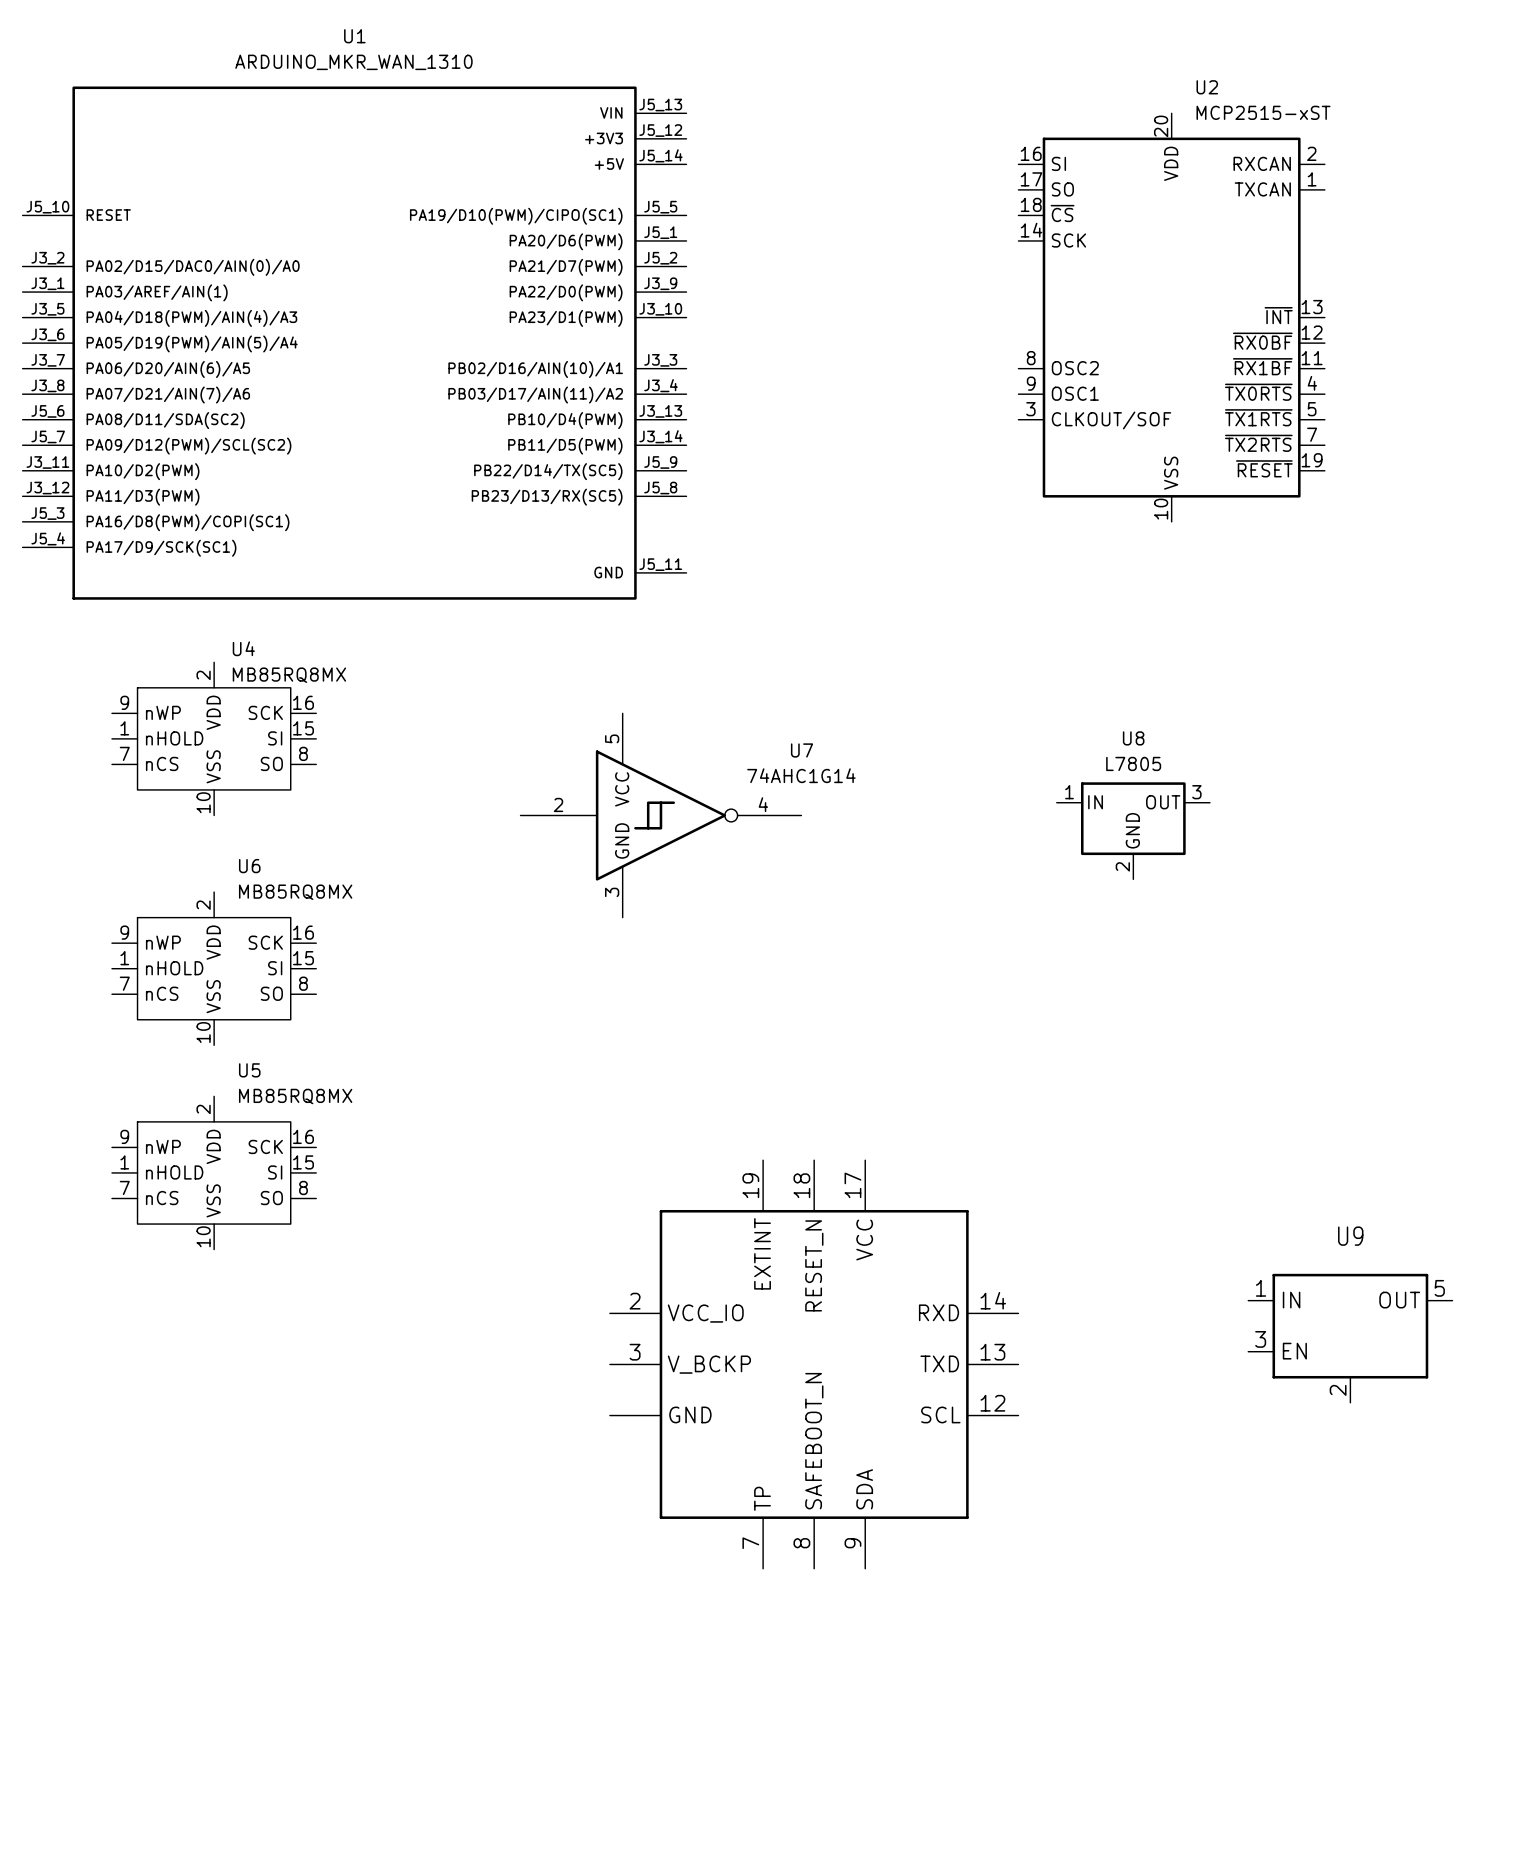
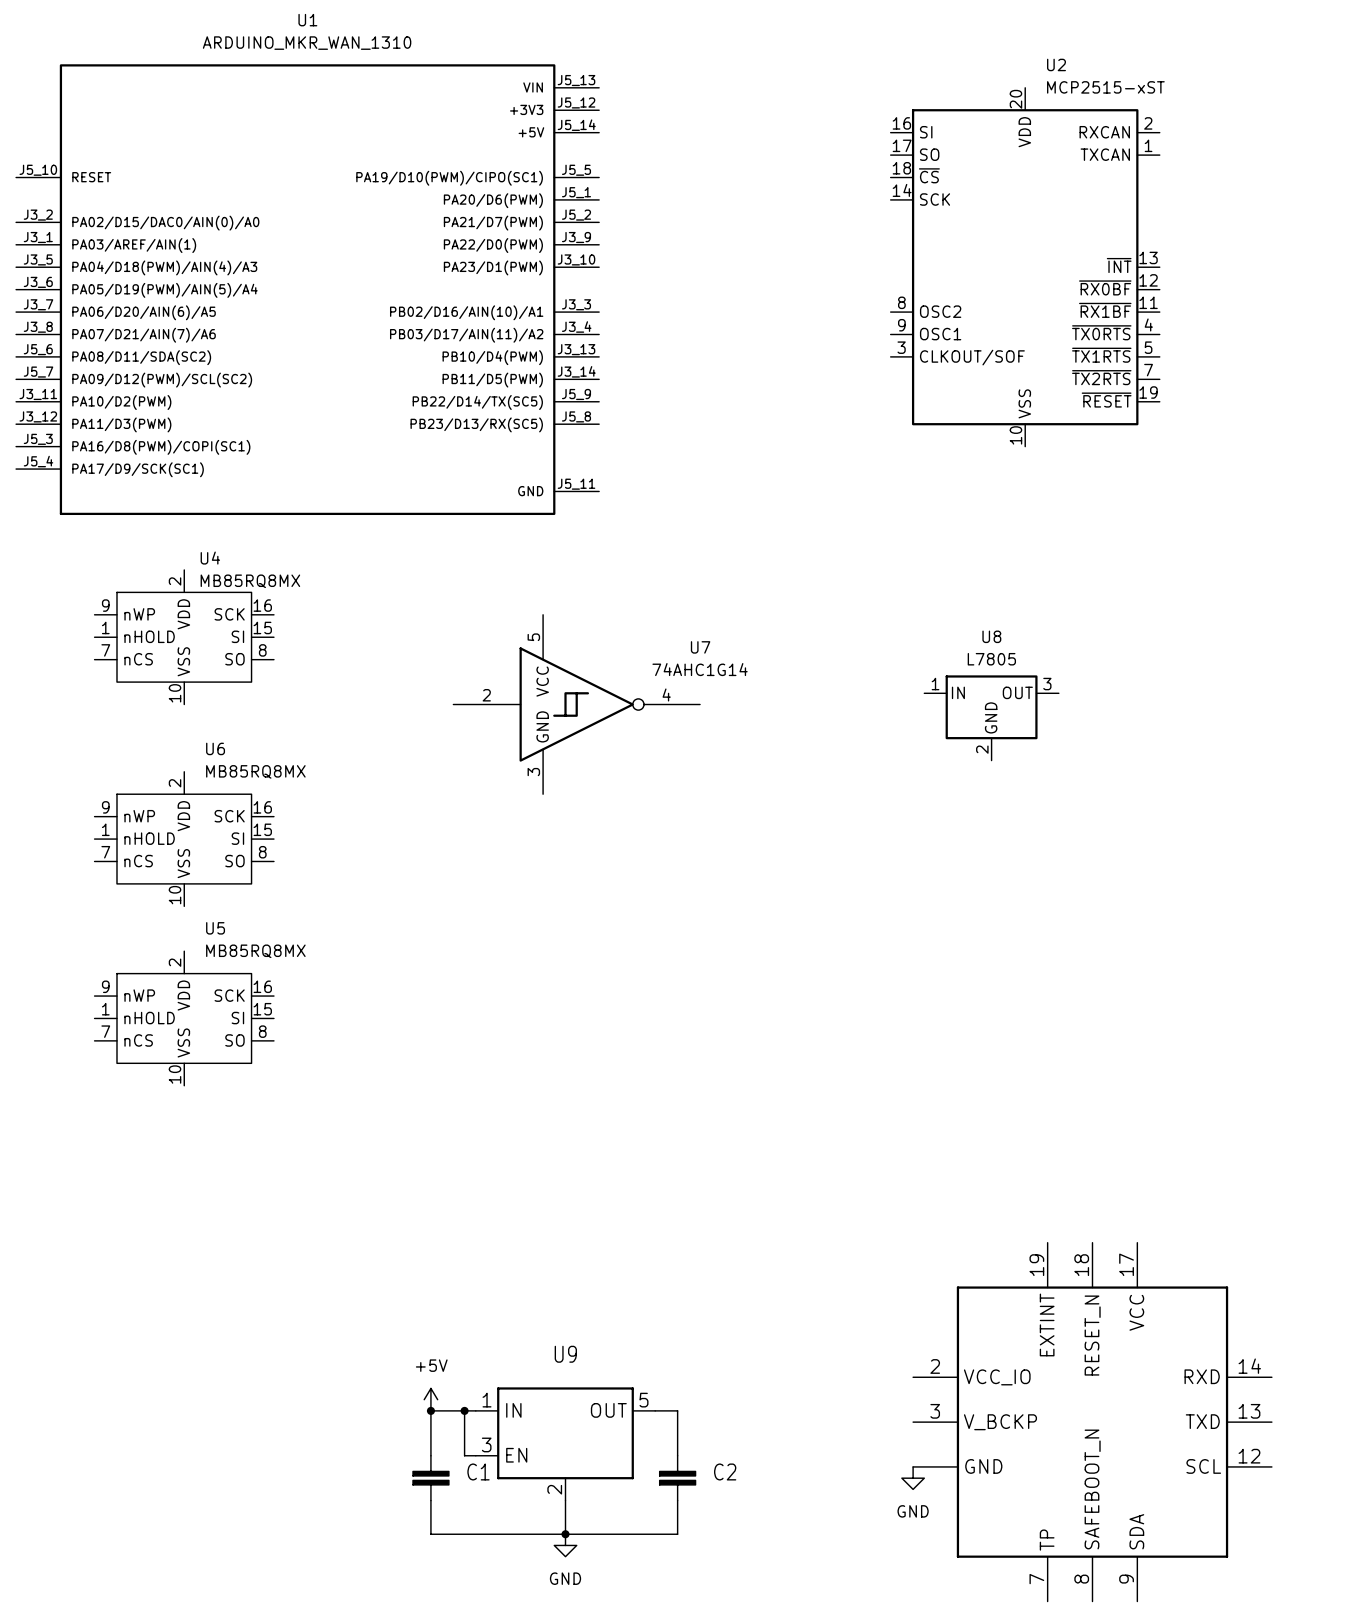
U9 position: (1350, 1338) -> (565, 1443)
part: (814, 1364) -> none
power symbol: none -> +5V (430, 1399)
junction: none -> (430, 1410)
wire: none -> (464, 1410) (464, 1455) (475, 1455)
junction: none -> (464, 1410)
wire: none -> (475, 1410) (430, 1410) (430, 1455)
wire: none -> (655, 1410) (677, 1410) (677, 1455)
part: none -> (1092, 1422)
C1: none -> (430, 1478)
C2: none -> (677, 1478)
power symbol: none -> GND (913, 1478)
wire: none -> (430, 1500) (430, 1534) (677, 1534) (677, 1500)
wire: none -> (565, 1500) (565, 1534)
junction: none -> (565, 1534)
power symbol: none -> GND (565, 1545)

